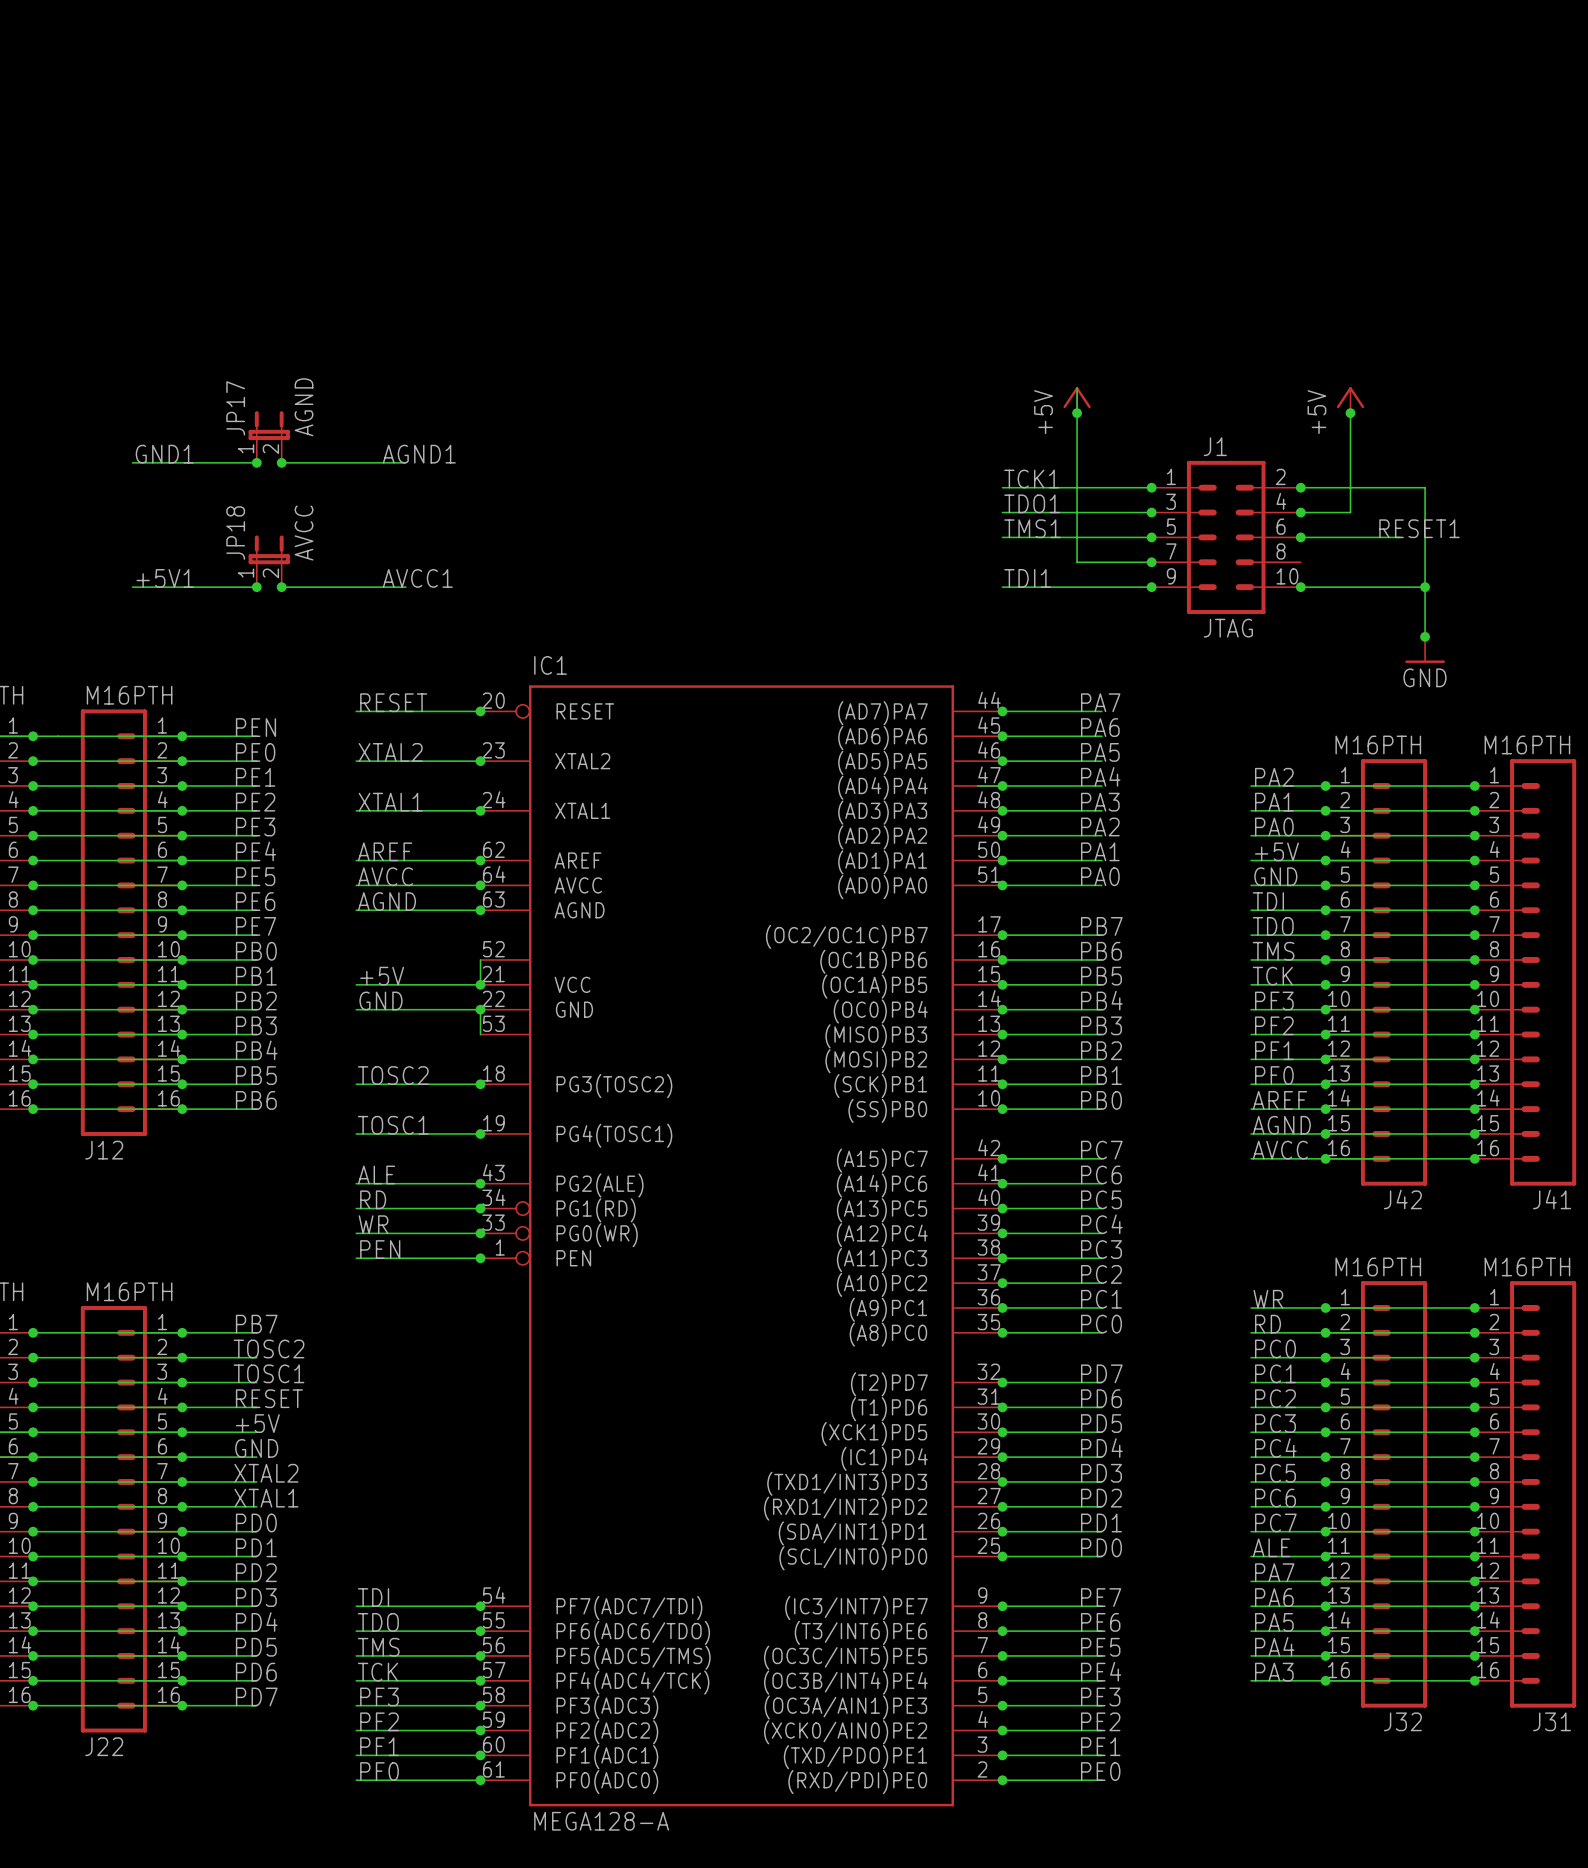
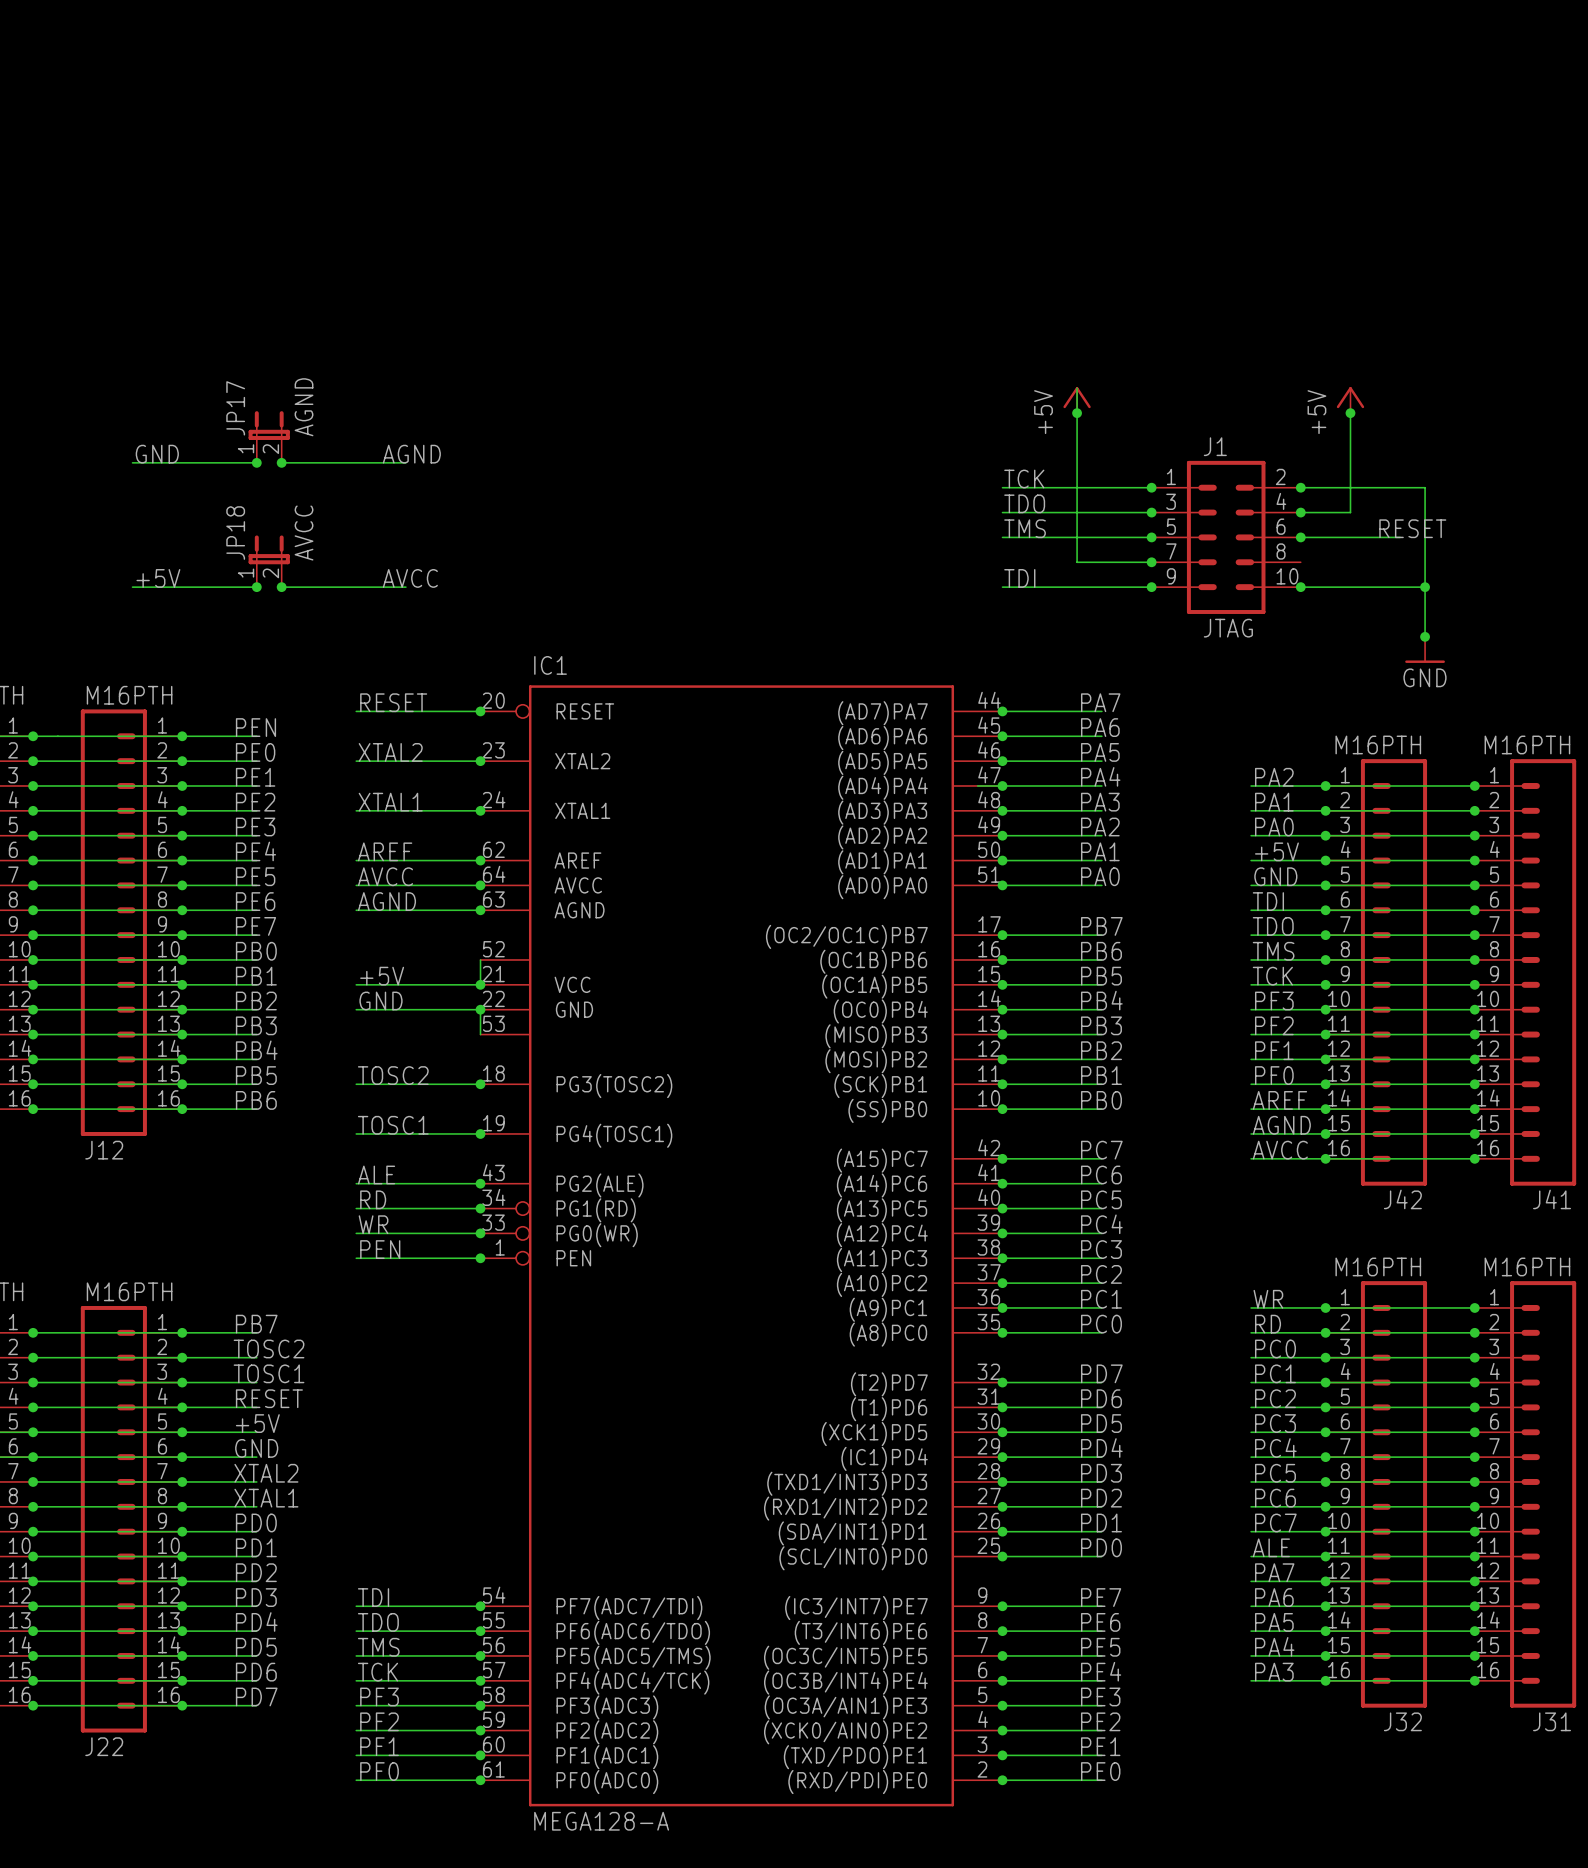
label: GND1 (164, 454) -> GND (157, 454)
label: AGND1 (419, 454) -> AGND (411, 454)
label: TCK1 (1031, 479) -> TCK (1024, 479)
label: TDO1 (1032, 503) -> TDO (1024, 503)
label: TMS1 (1032, 528) -> TMS (1025, 528)
label: RESET1 (1419, 528) -> RESET (1412, 528)
label: +5V1 (165, 578) -> +5V (158, 578)
label: AVCC1 (417, 578) -> AVCC (410, 578)
label: TDI1 (1027, 578) -> TDI (1019, 578)

